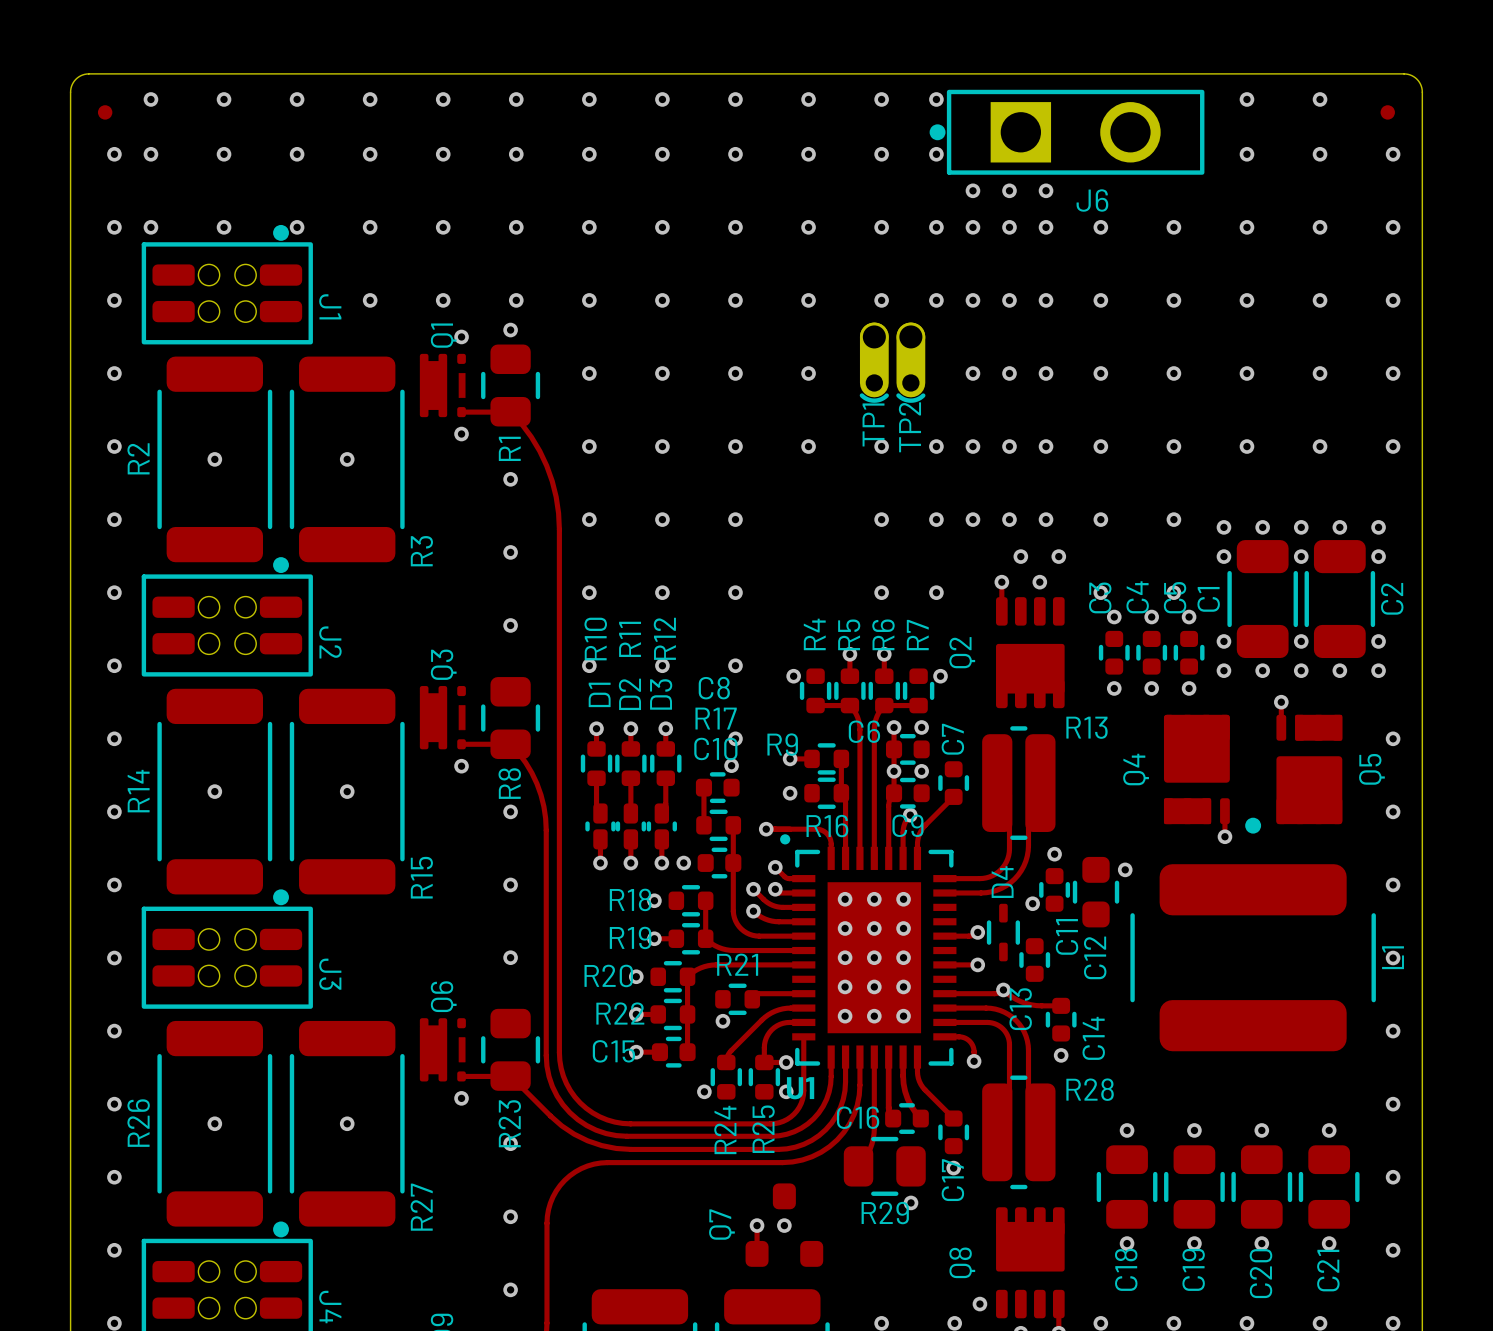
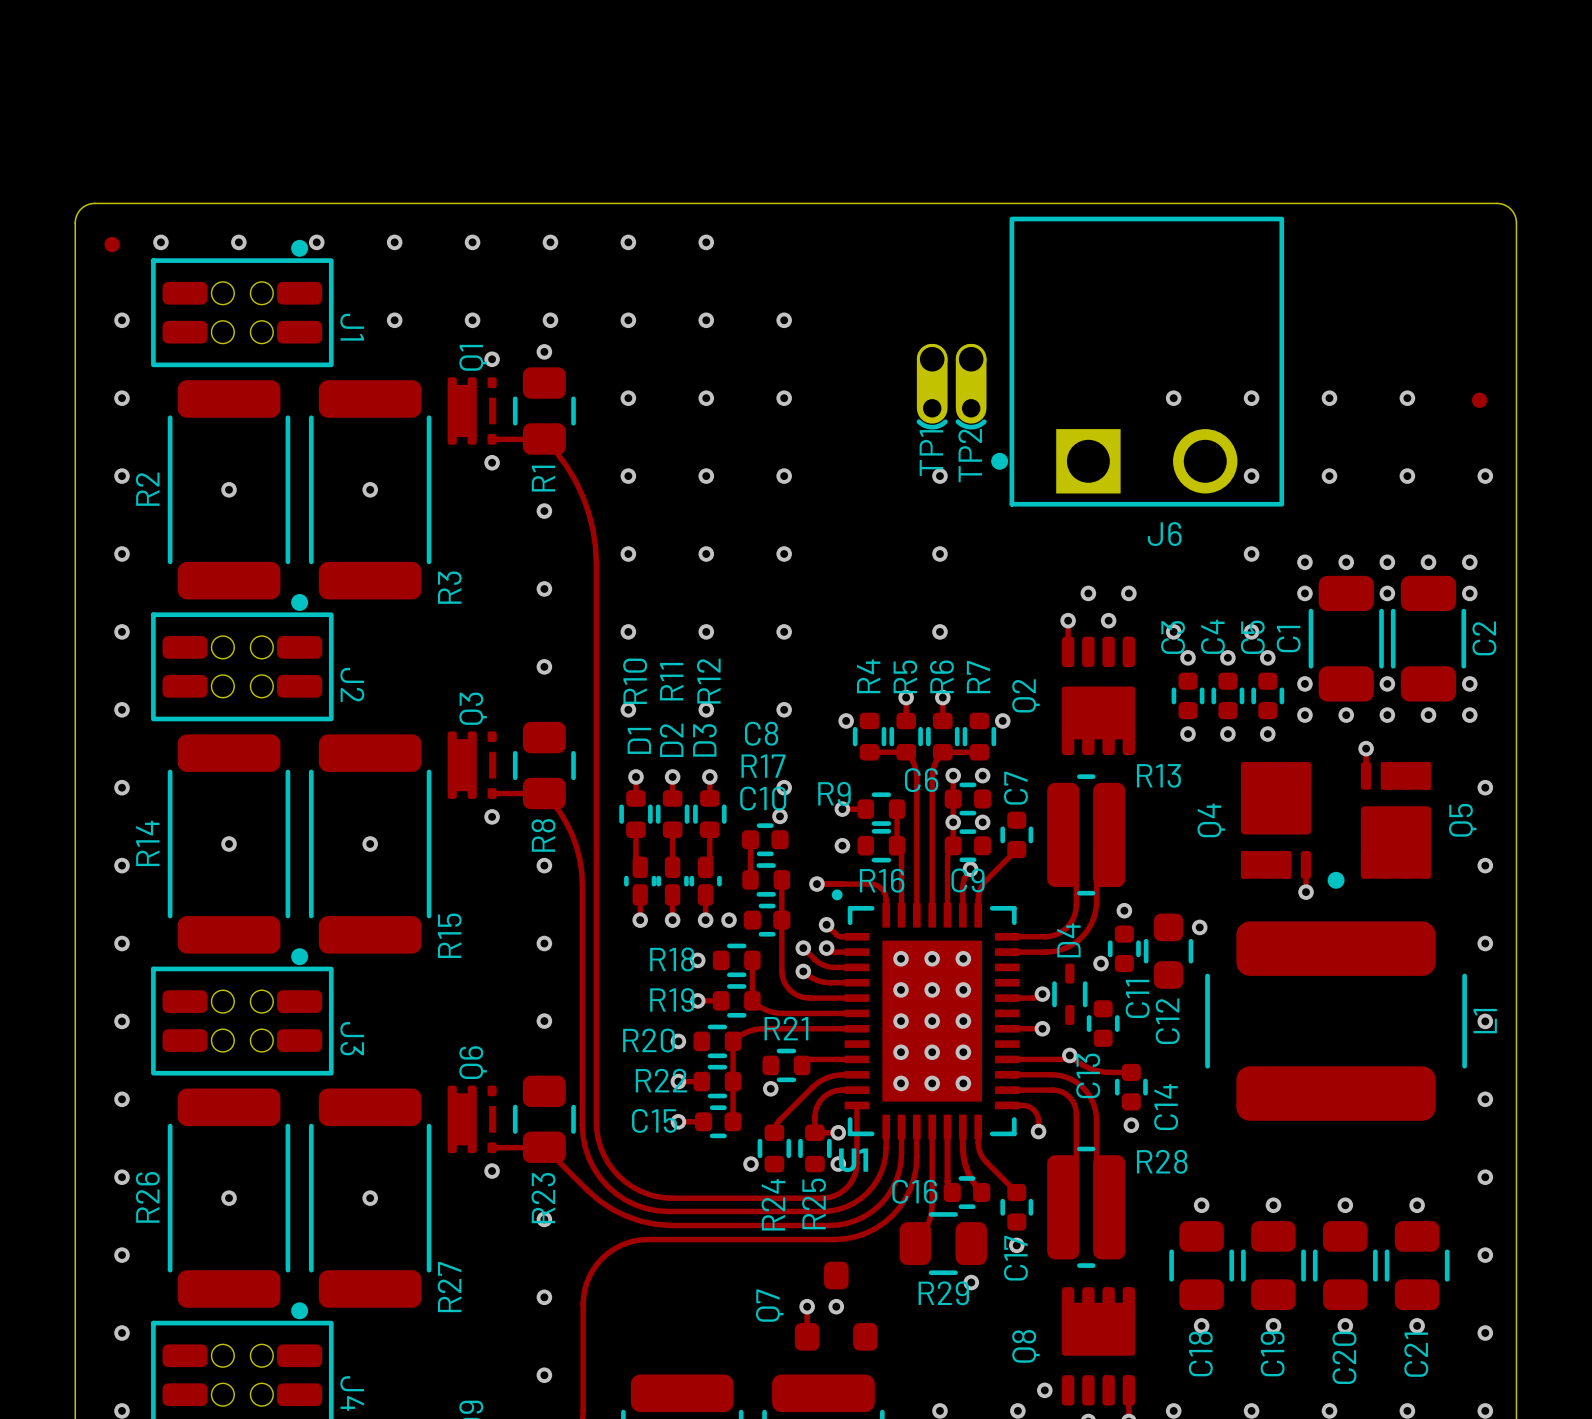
J6 footprint: [929, 89, 1205, 175] -> [991, 216, 1285, 507]
via: (150, 99) -> none
via: (224, 99) -> none
via: (297, 99) -> none
via: (370, 99) -> none
via: (443, 99) -> none
via: (516, 99) -> none
via: (589, 99) -> none
via: (662, 99) -> none
via: (735, 99) -> none
via: (808, 99) -> none
via: (881, 99) -> none
via: (936, 99) -> none
via: (1246, 99) -> none
via: (1320, 99) -> none
part position: (105, 112) -> (112, 244)
part position: (1387, 112) -> (1479, 400)
via: (114, 154) -> none
via: (150, 154) -> none
via: (224, 154) -> none
via: (297, 154) -> none
via: (370, 154) -> none
via: (443, 154) -> none
via: (516, 154) -> none
via: (589, 154) -> none
via: (662, 154) -> none
via: (735, 154) -> none
via: (808, 154) -> none
via: (881, 154) -> none
via: (936, 154) -> none
via: (1246, 154) -> none
via: (1320, 154) -> none
via: (1393, 154) -> none
via: (972, 190) -> none
via: (1009, 190) -> none
via: (1046, 190) -> none
J6 name position: J6 (1092, 200) -> J6 (1164, 534)
board edge: (70, 209) (70, 90) (77, 77) (88, 73) (1406, 74) (1416, 79) (1422, 90) (1422, 209) -> (75, 222) (80, 209) (94, 203) (1496, 203) (1510, 209) (1516, 222)
via: (114, 227) -> none
via: (735, 227) -> none
via: (808, 227) -> none
via: (881, 227) -> none
via: (936, 227) -> none
via: (972, 227) -> none
via: (1009, 227) -> none
via: (1046, 227) -> none
via: (1100, 227) -> none
via: (1173, 227) -> none
via: (1246, 227) -> none
via: (1320, 227) -> none
via: (1393, 227) -> none
via: (808, 300) -> none
via: (881, 300) -> none
via: (936, 300) -> none
via: (972, 300) -> none
via: (1009, 300) -> none
via: (1046, 300) -> none
via: (1100, 300) -> none
via: (1173, 300) -> none
via: (1246, 300) -> none
via: (1320, 300) -> none
via: (1393, 300) -> none
via: (808, 373) -> none
via: (972, 373) -> none
via: (1009, 373) -> none
via: (1046, 373) -> none
via: (1393, 373) -> none
via: (808, 446) -> none
via: (936, 446) -> none
via: (972, 446) -> none
via: (1009, 446) -> none
via: (1046, 446) -> none
via: (1100, 446) -> none
via: (936, 519) -> none
via: (972, 519) -> none
via: (1009, 519) -> none
via: (1046, 519) -> none
via: (1100, 519) -> none
via: (936, 592) -> none

